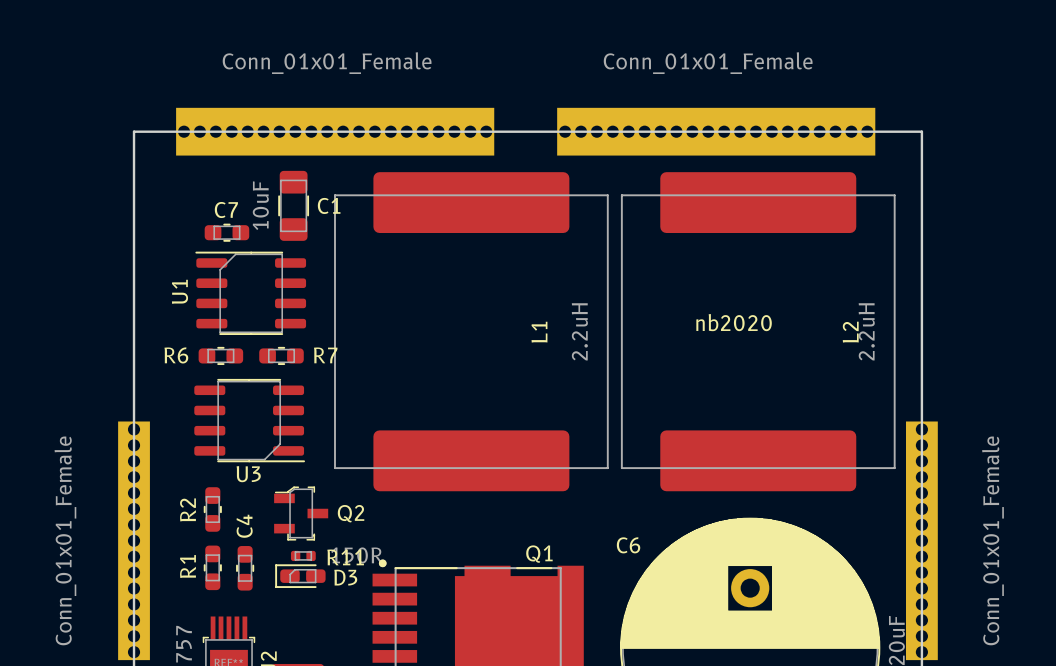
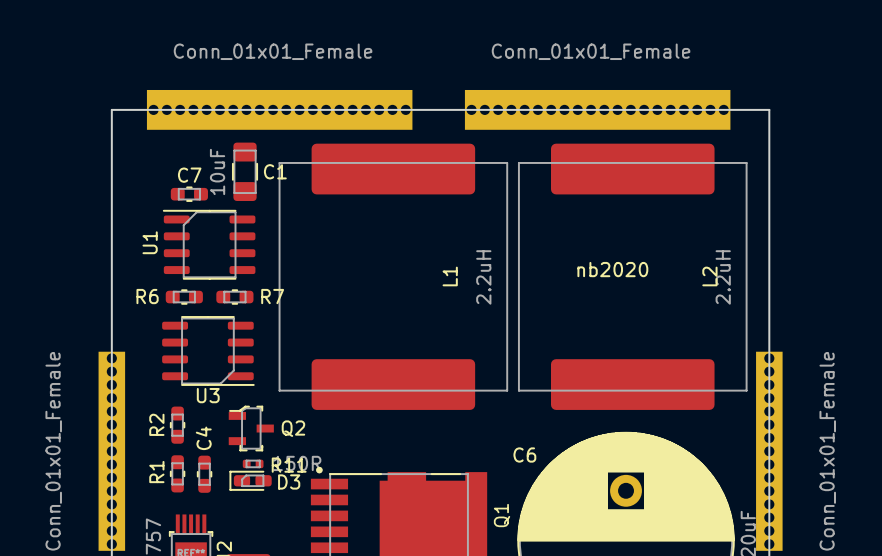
Q1 name rotation: 0° (539, 554) -> 90° counterclockwise (502, 515)
Q1 name position: Q1 (539, 554) -> Q1 (502, 515)

